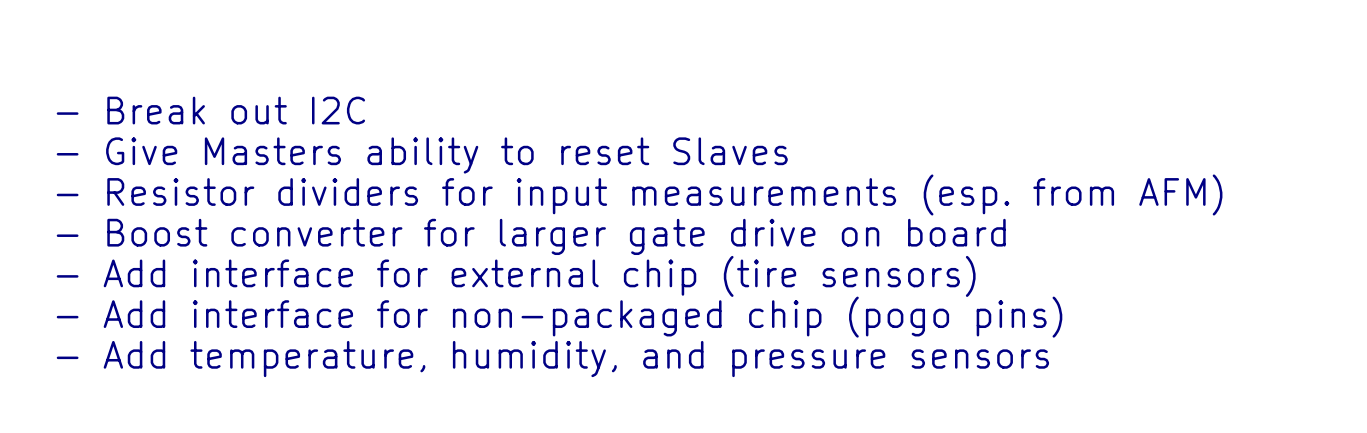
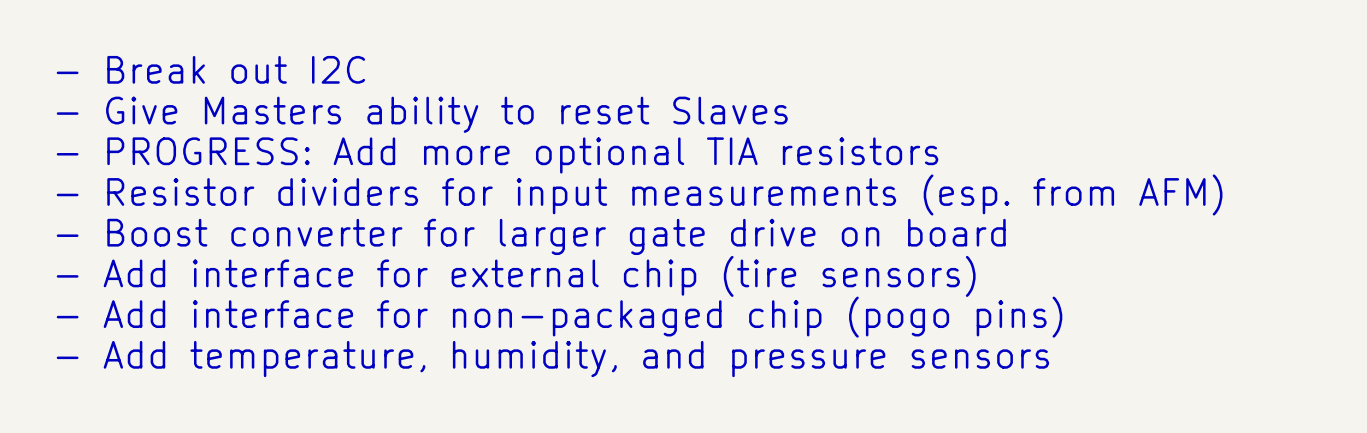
text: none -> - Break out I2C (210, 69)
text: - Break out I2C (210, 110) -> - Give Masters ability to reset Slaves (422, 114)
text: - Give Masters ability to reset Slaves (422, 155) -> - PROGRESS: Add more optional TIA resistors (497, 155)

